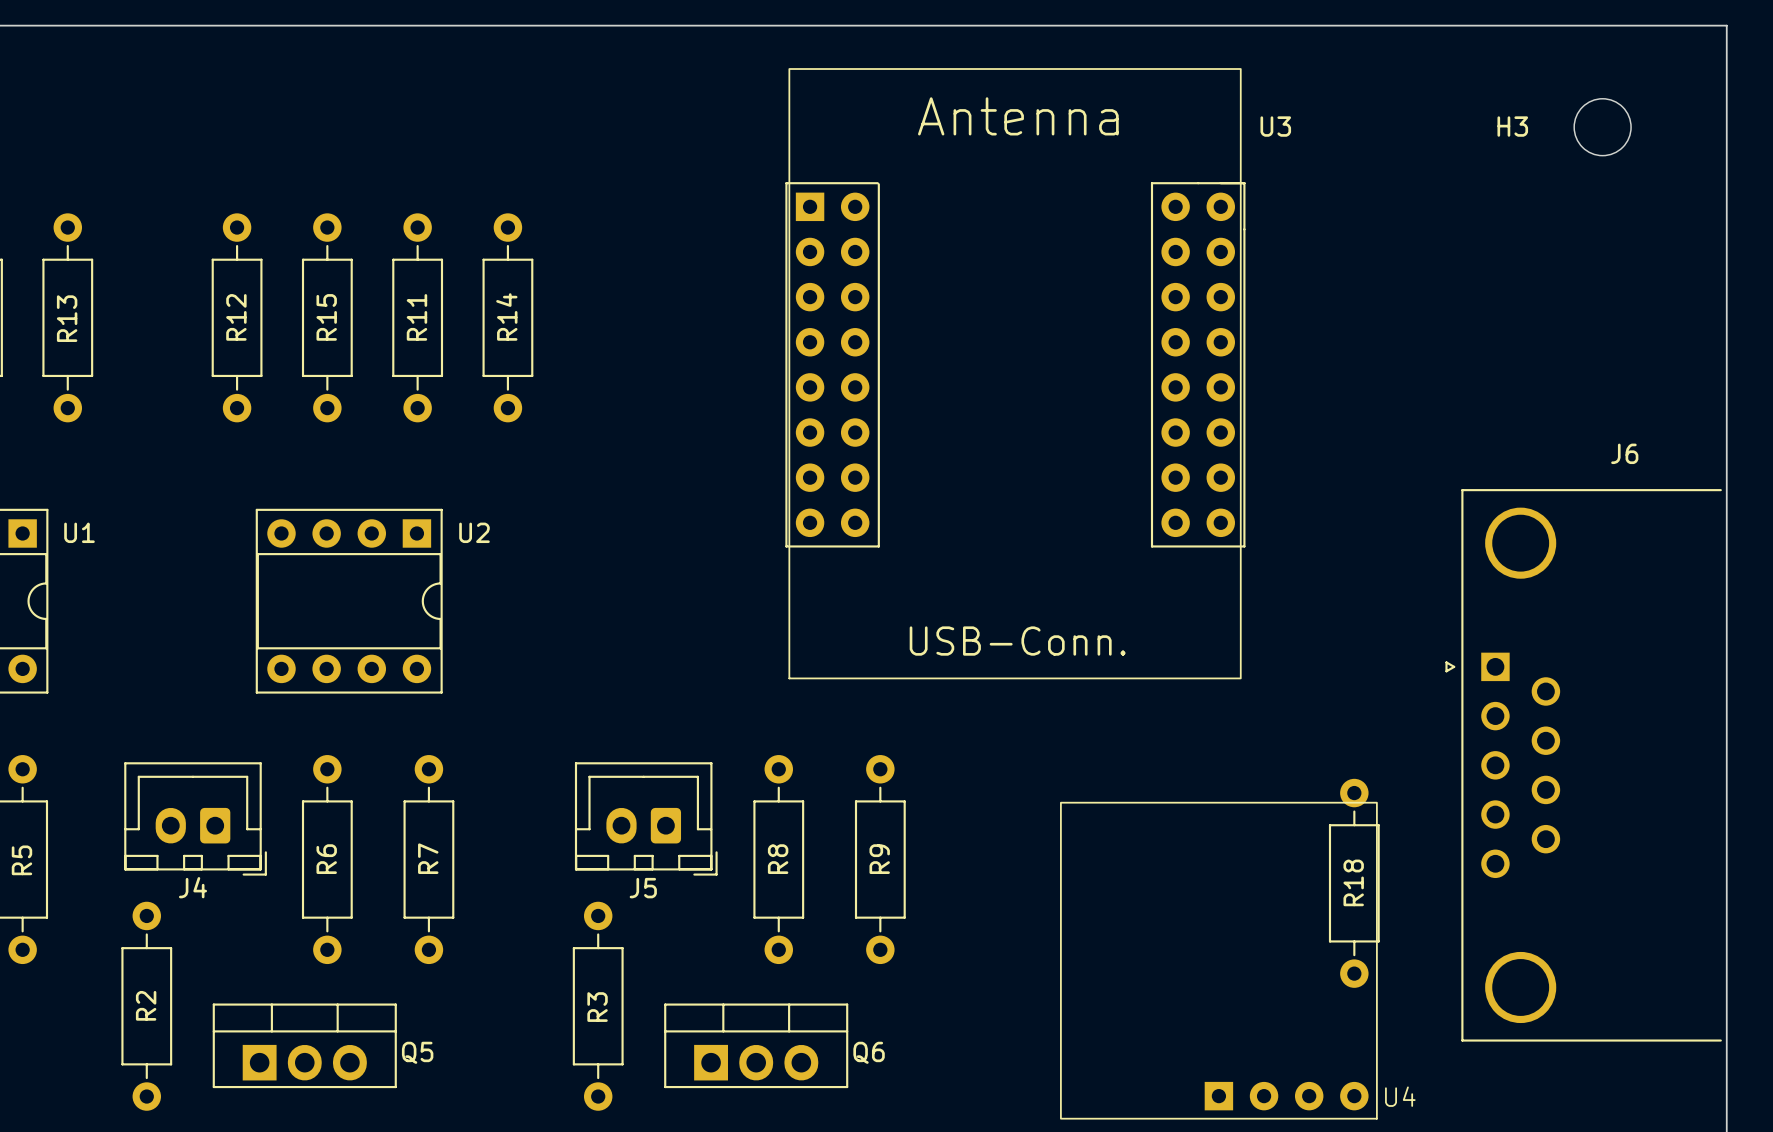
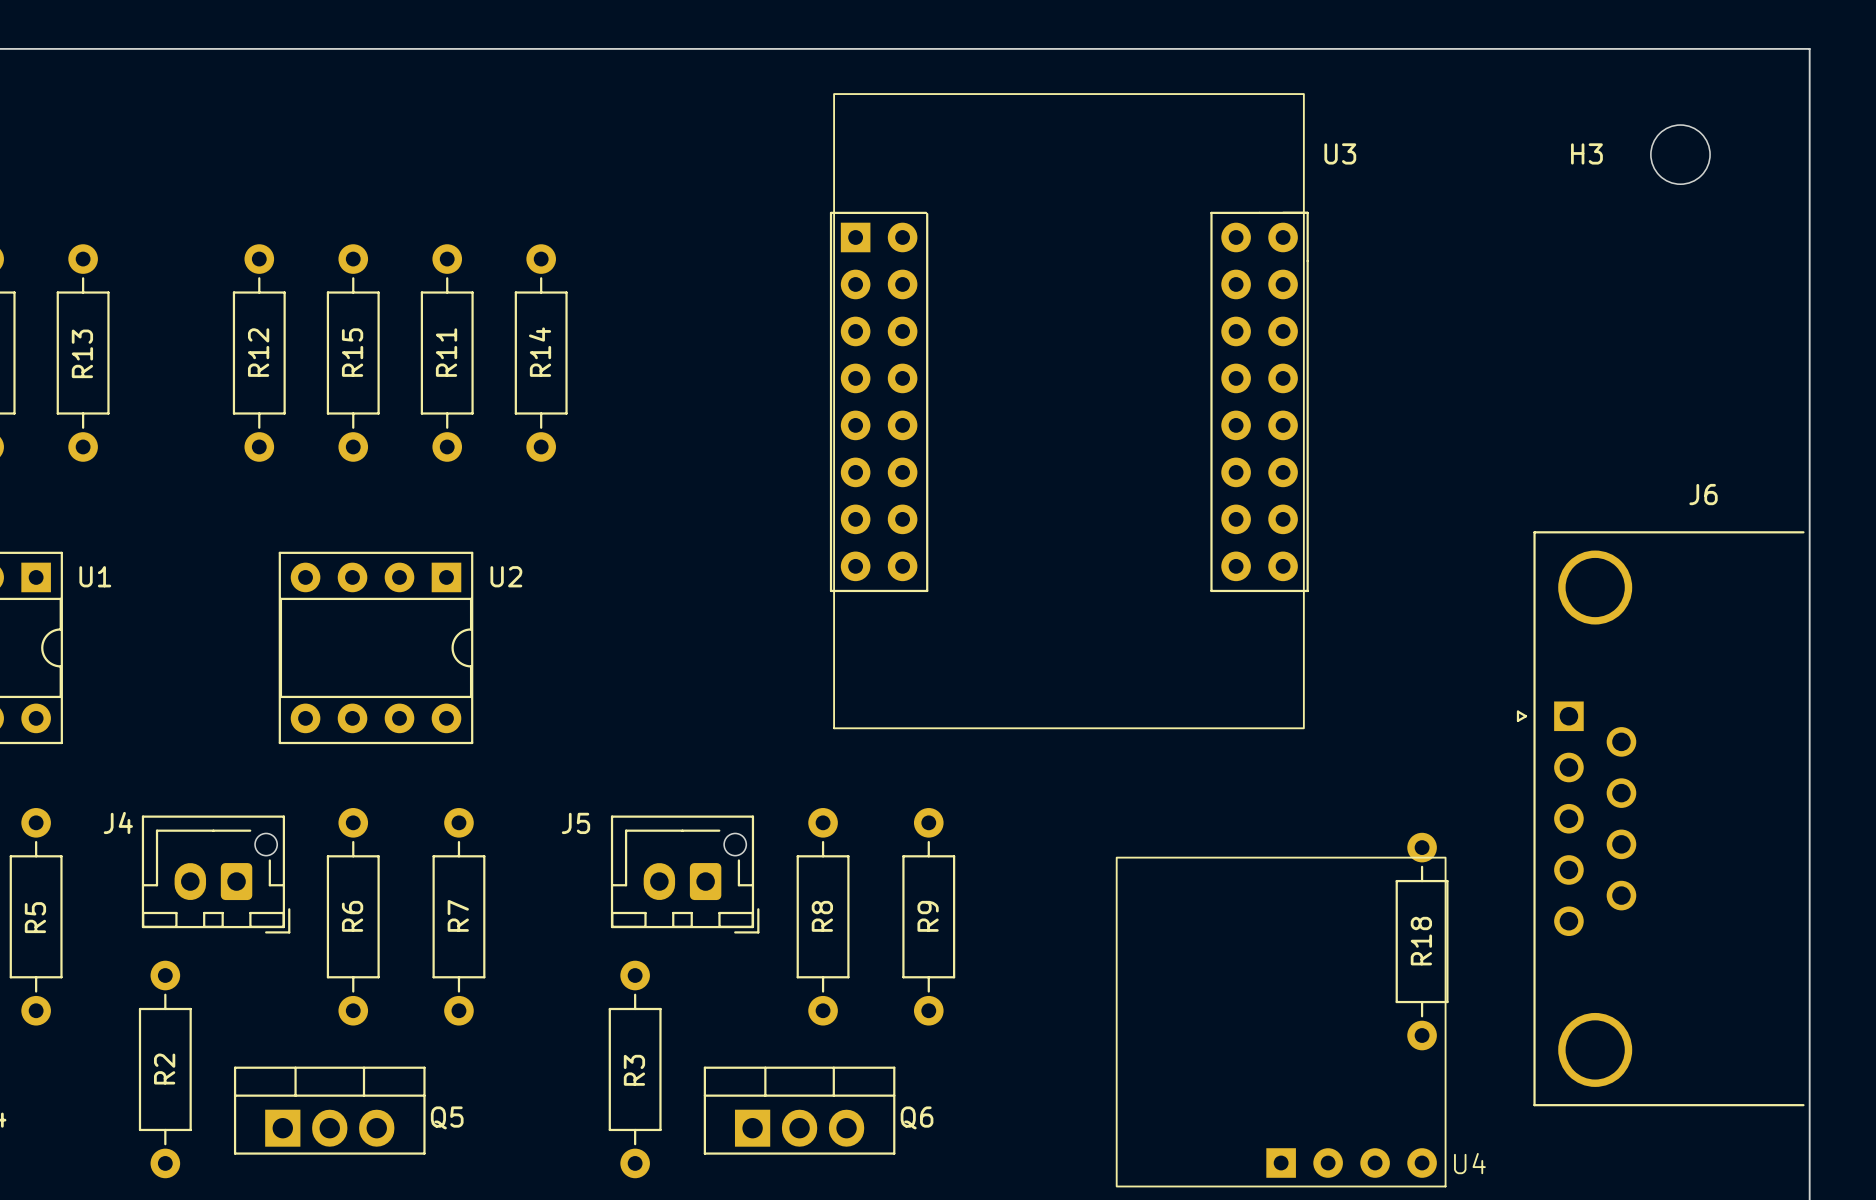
text: Antenna (1018, 116) -> none
text: USB-Conn. (1017, 641) -> none
J4 footprint: [124, 762, 267, 876] -> [141, 815, 291, 934]
J5 footprint: [574, 762, 718, 876] -> [610, 815, 760, 934]
J4 name position: J4 (192, 887) -> J4 (118, 822)
J5 name position: J5 (643, 888) -> J5 (575, 823)

